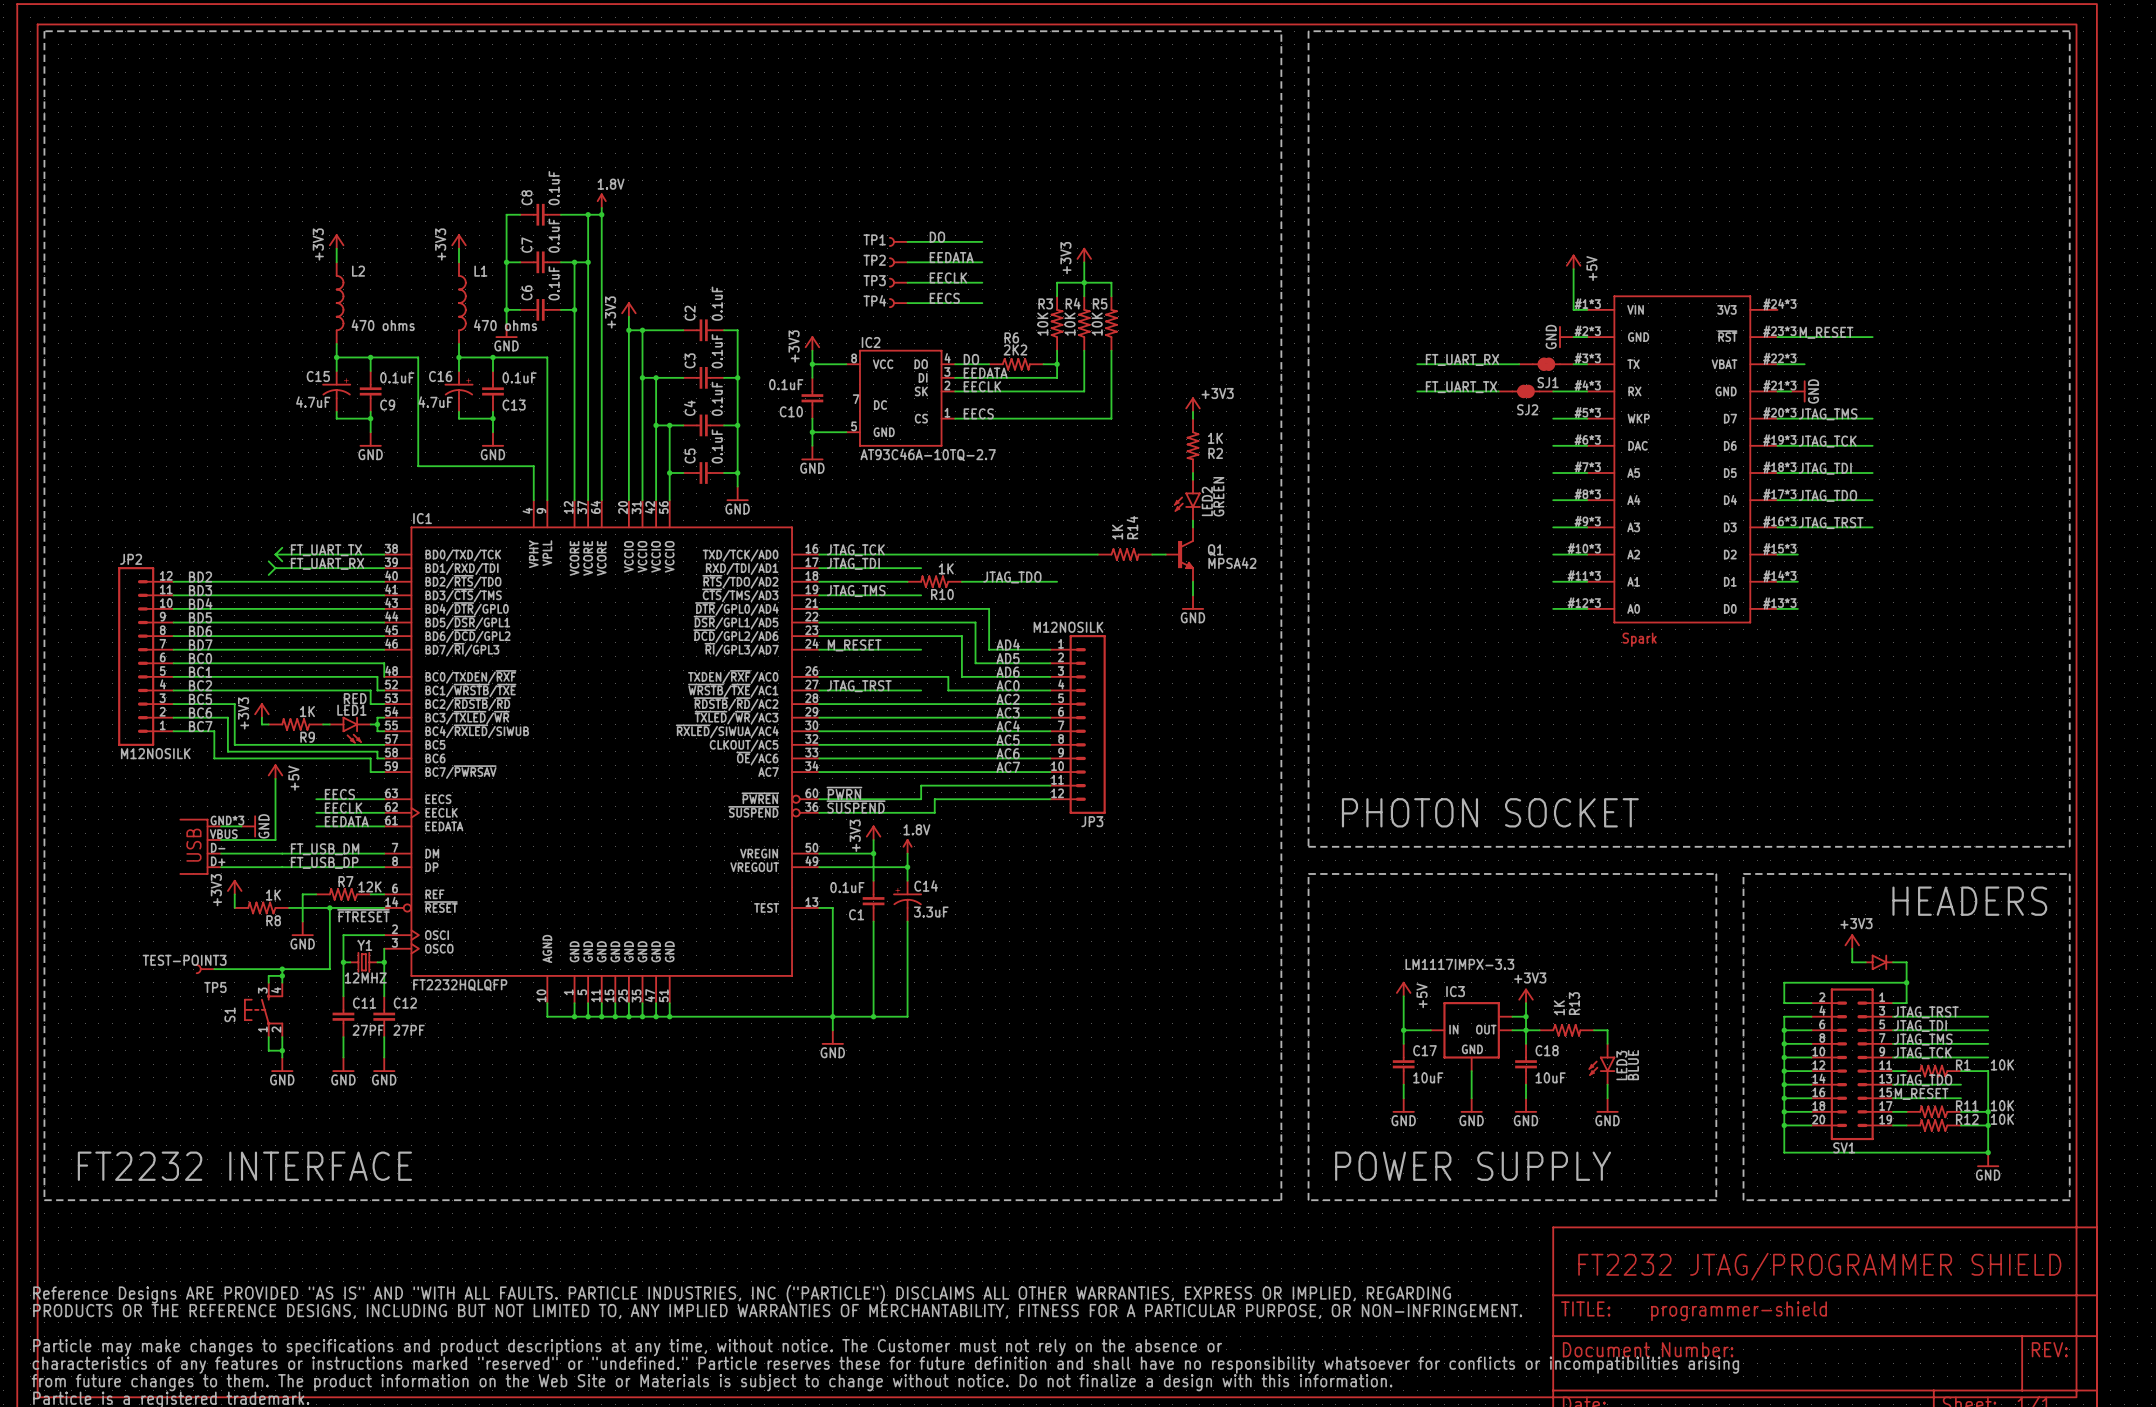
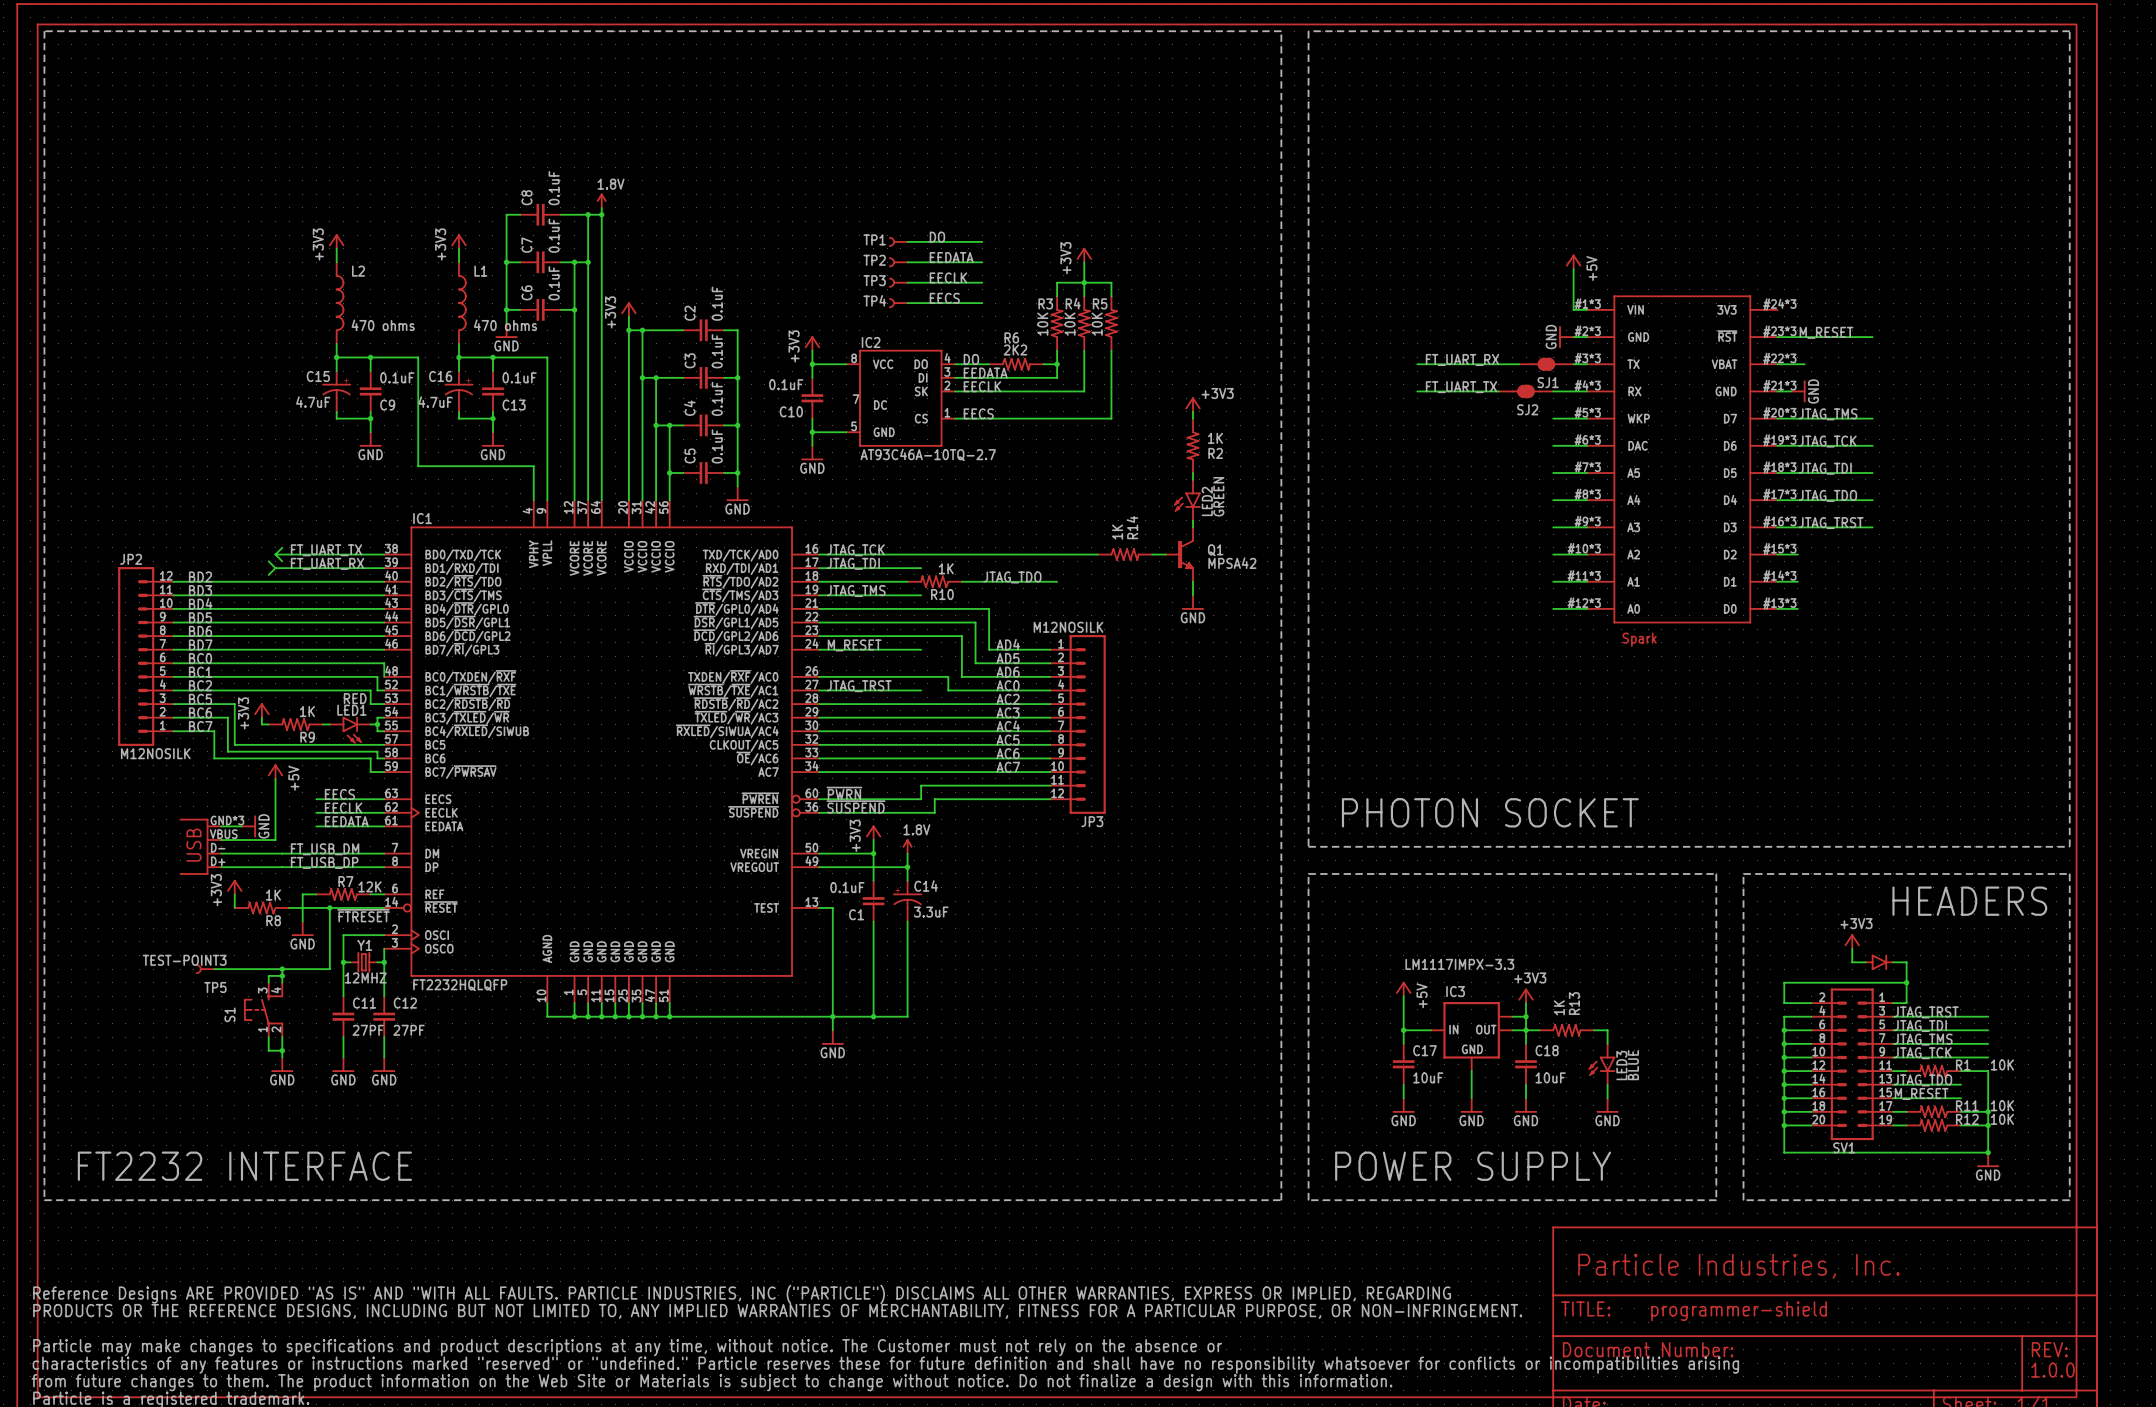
text: FT2232 JTAG/PROGRAMMER SHIELD (1819, 1266) -> Particle Industries, Inc. (1738, 1266)
text: none -> 1.0.0 (2052, 1370)

